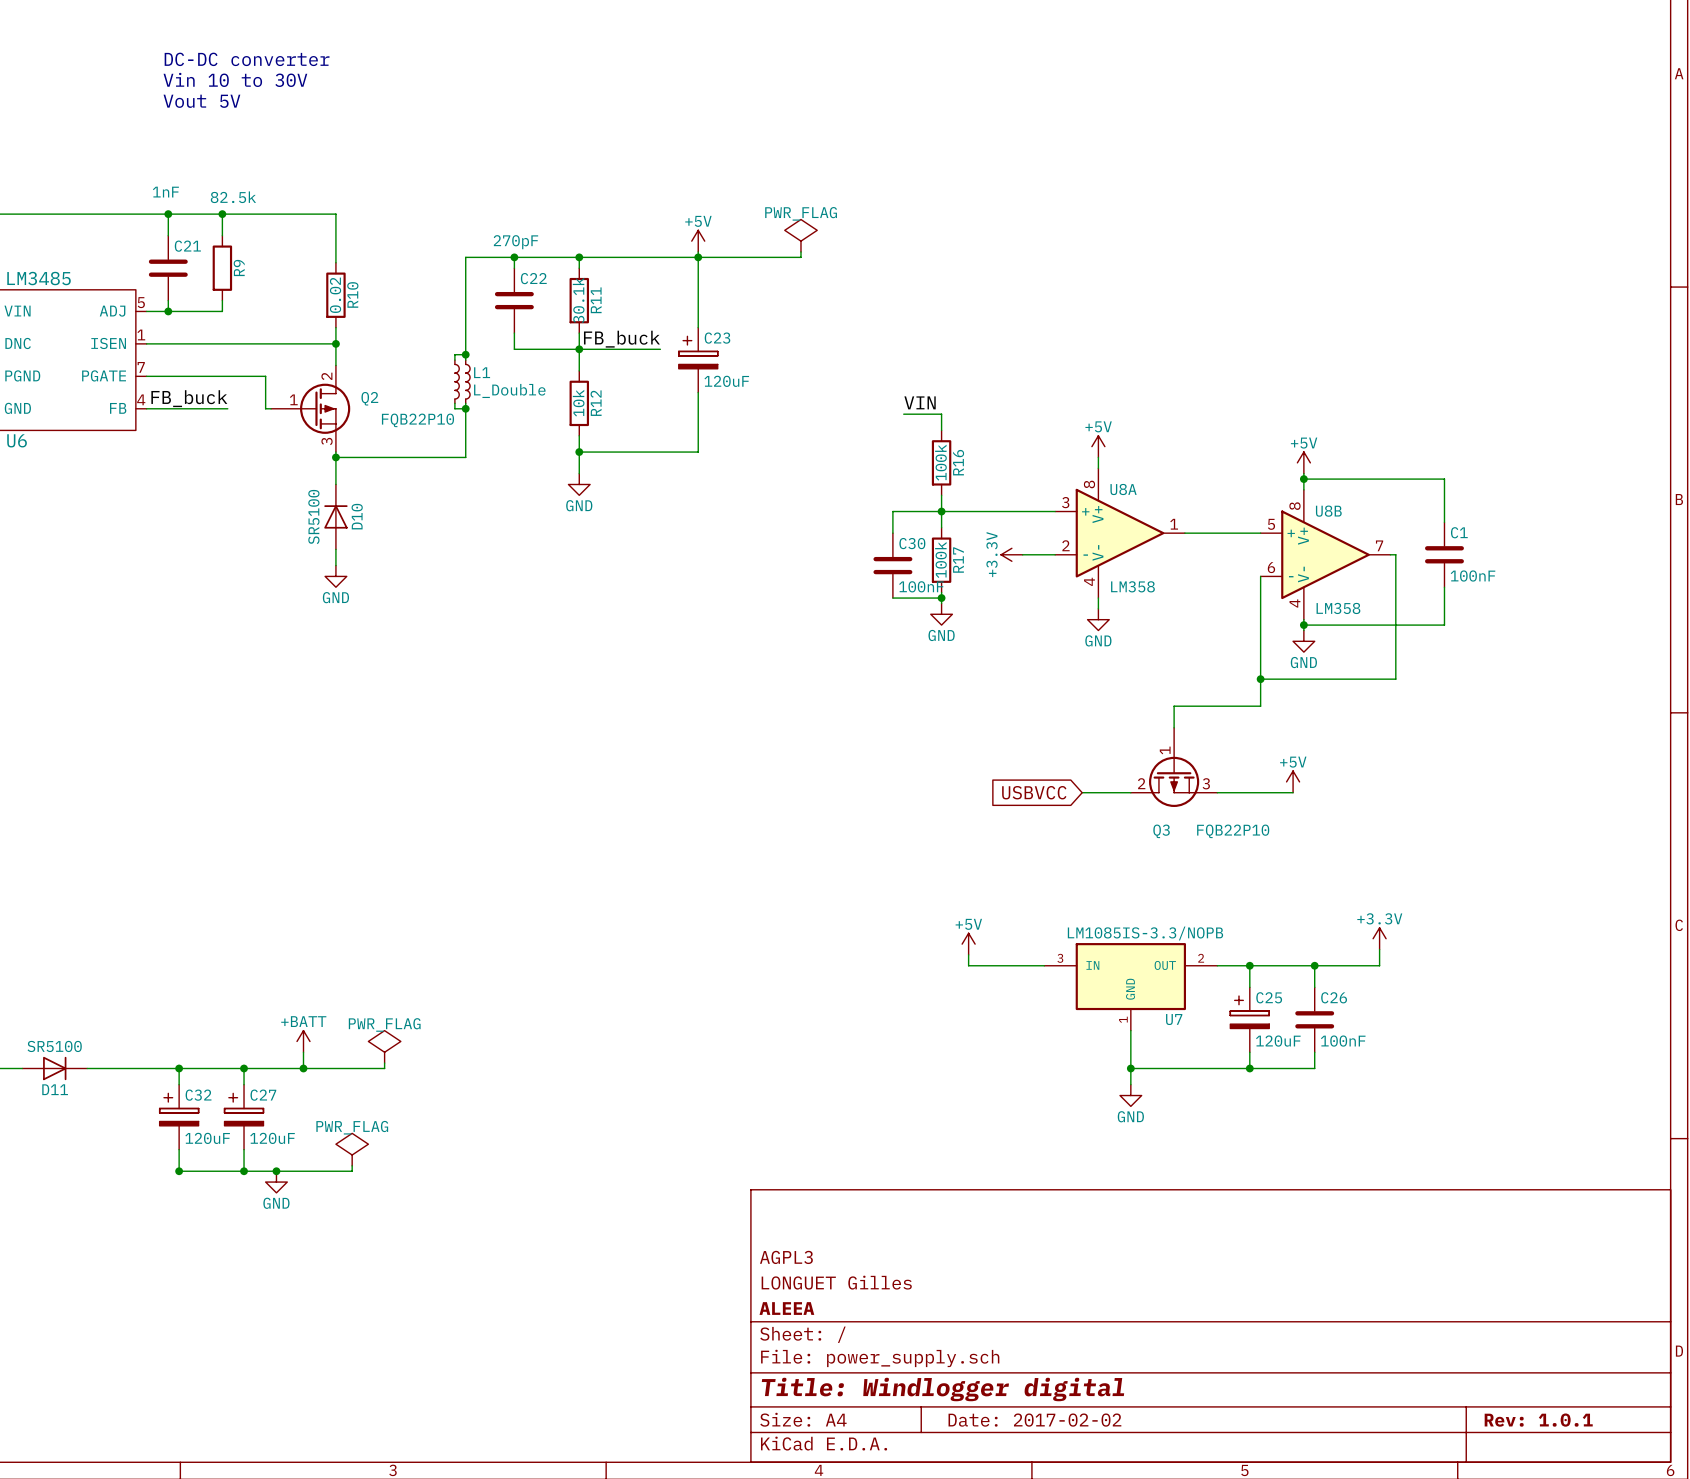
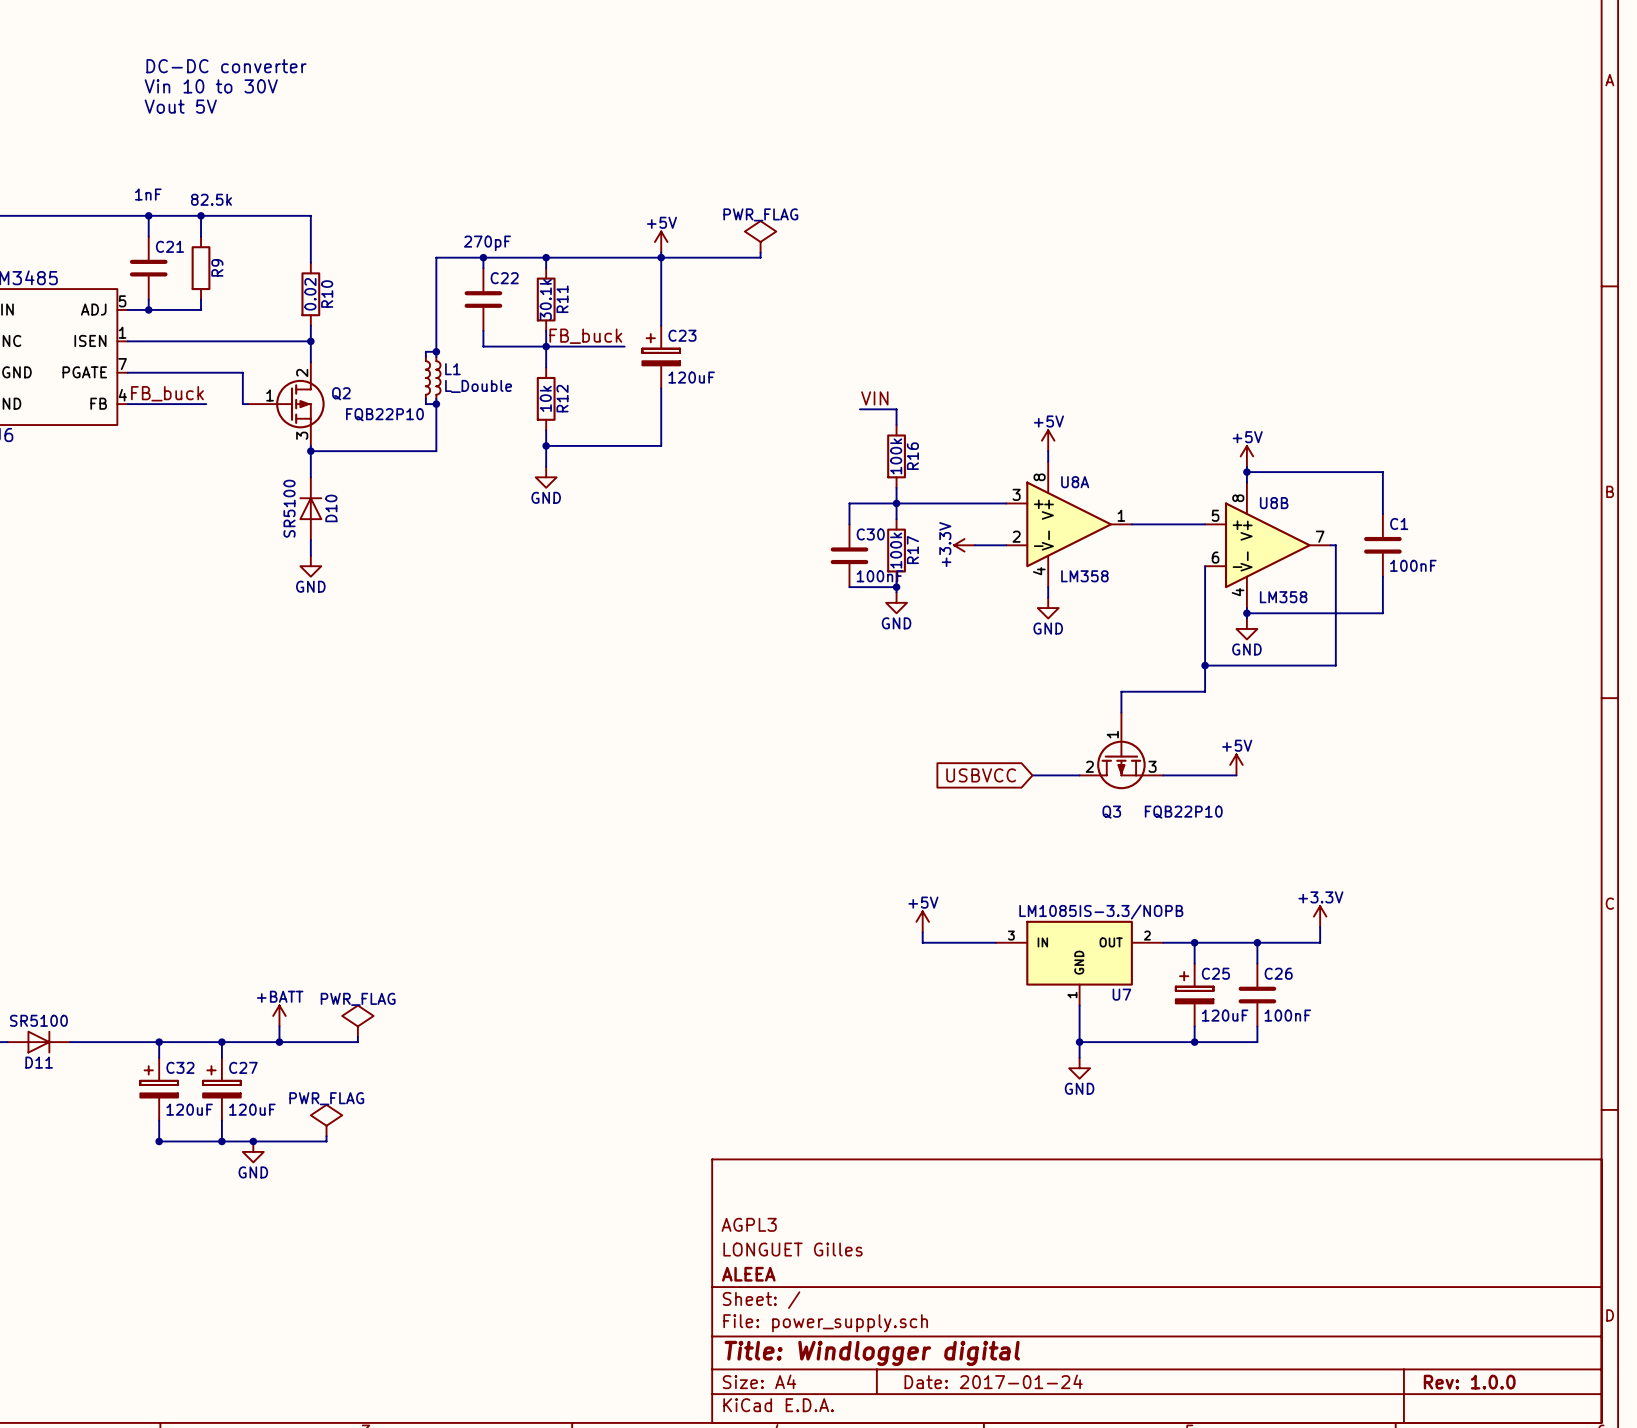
title block: Date: 2017-02-02 (1034, 1420) -> Date: 2017-01-24 (993, 1381)
title block: Rev: 1.0.1 (1538, 1420) -> Rev: 1.0.0 (1469, 1382)

